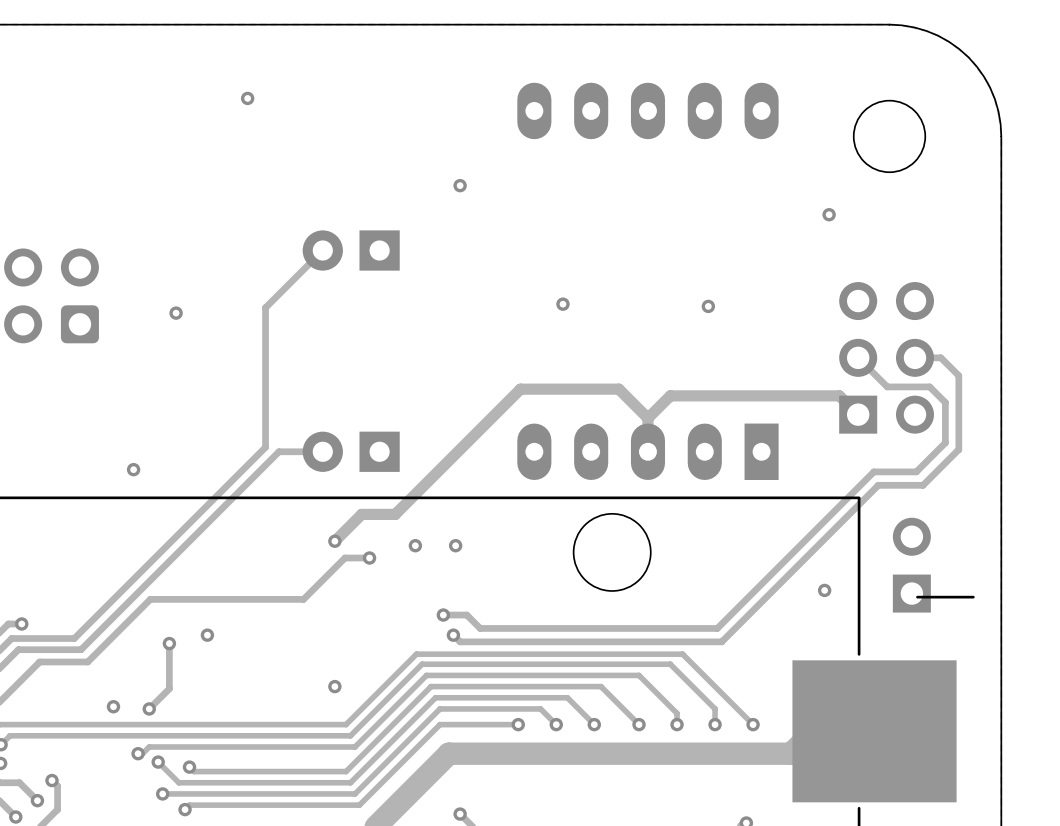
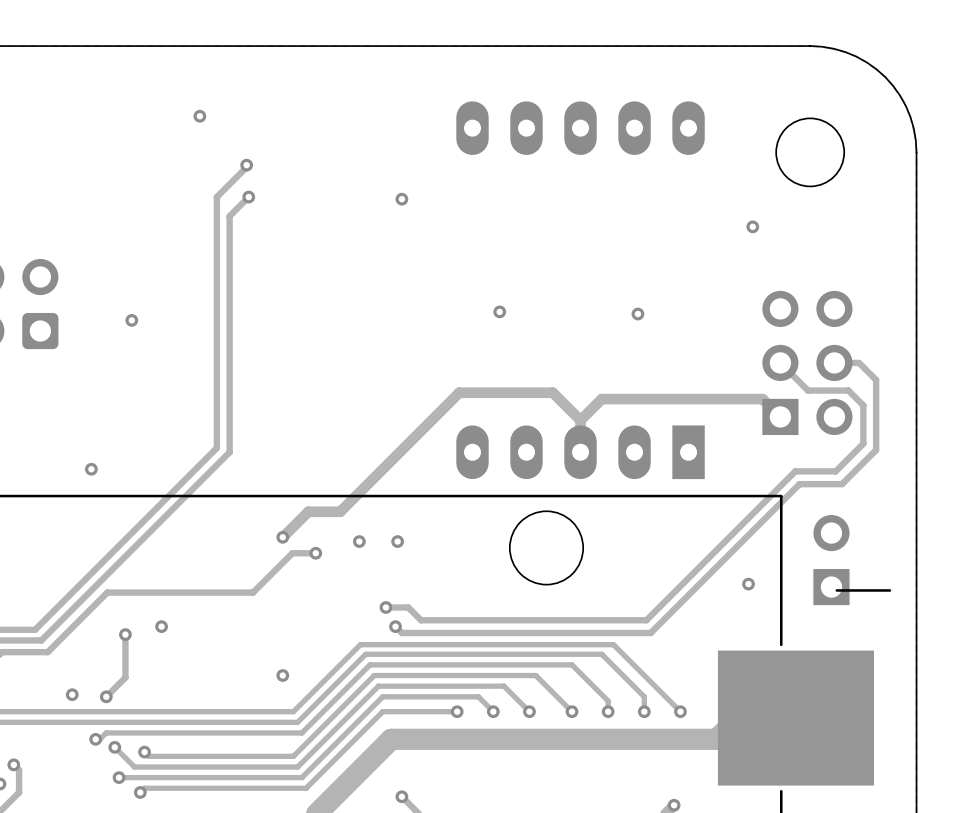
via: none -> (246, 165)
via: none -> (248, 197)
track: (322, 250) (265, 307) -> (246, 165) (216, 197) (216, 315)
part: (351, 250) -> none
track: (322, 451) (278, 451) -> (248, 197) (229, 216) (229, 452)
part: (351, 451) -> none

